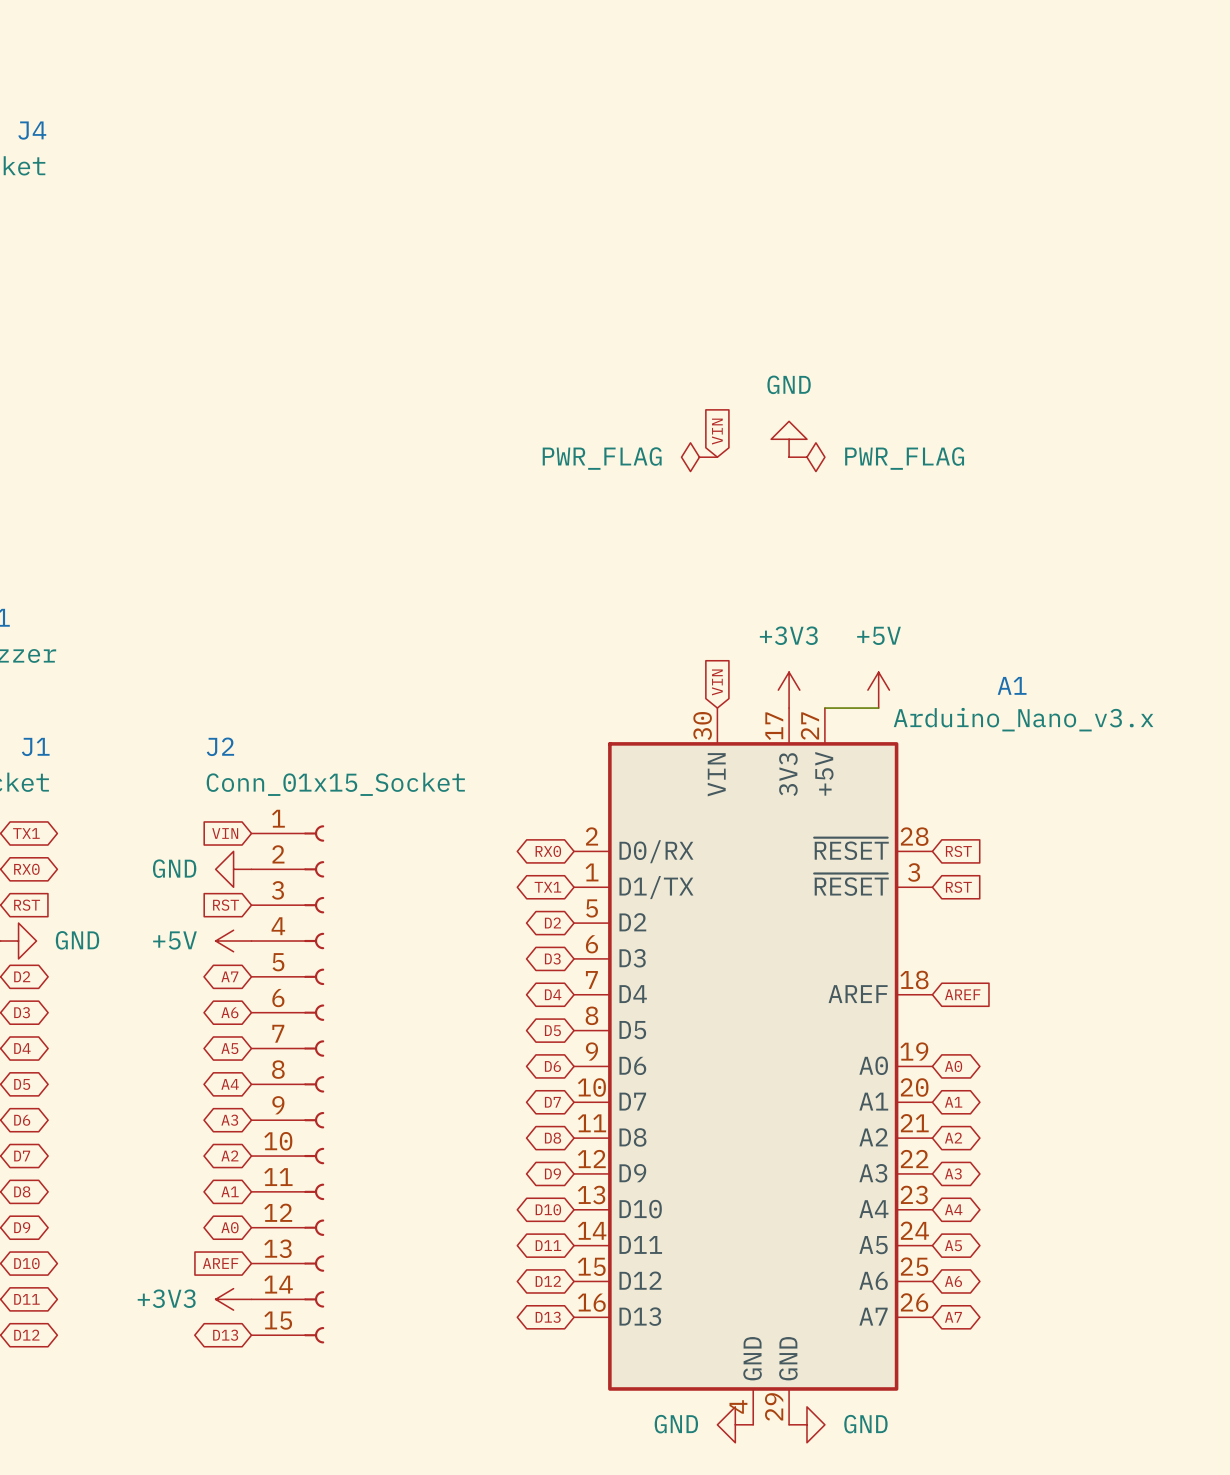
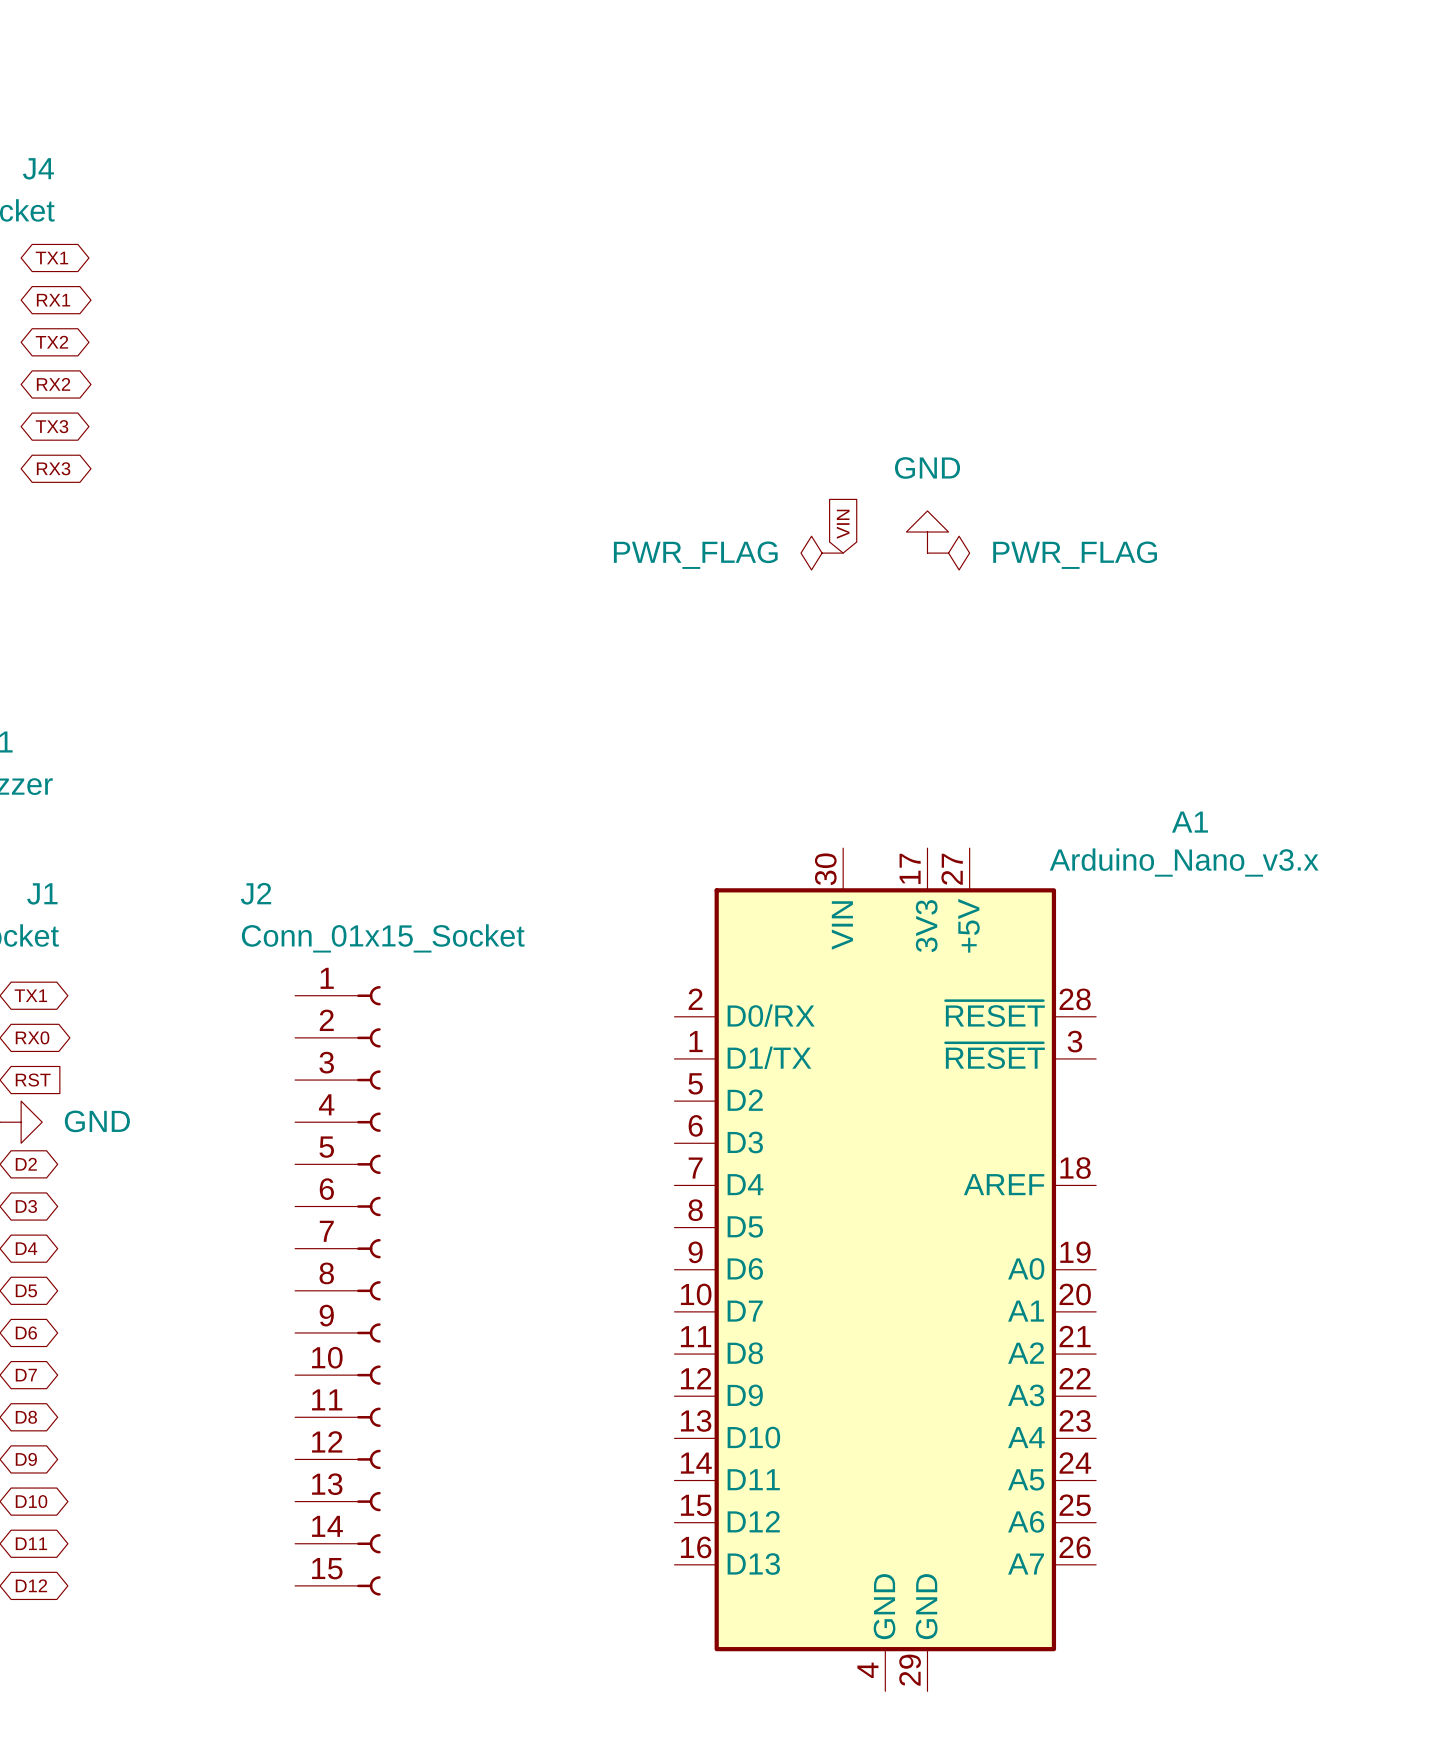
global label: none -> TX1 (51, 258)
global label: none -> RX1 (53, 300)
global label: none -> TX2 (51, 342)
global label: none -> RX2 (53, 384)
global label: none -> TX3 (52, 426)
global label: none -> RX3 (53, 468)
global label: VIN (717, 682) -> none
power symbol: +3V3 (789, 690) -> none
power symbol: +5V (878, 690) -> none
wire: (824, 708) (878, 708) -> none
global label: VIN (225, 833) -> none
global label: RX0 (548, 851) -> none
global label: RST (958, 851) -> none
power symbol: GND (233, 869) -> none
global label: TX1 (547, 887) -> none
global label: RST (958, 887) -> none
global label: RST (226, 905) -> none
global label: D2 (552, 922) -> none
power symbol: +5V (233, 941) -> none
global label: D3 (552, 958) -> none
global label: A7 (229, 976) -> none
global label: D4 (553, 994) -> none
global label: AREF (962, 994) -> none
global label: A6 (229, 1012) -> none
global label: D5 (552, 1030) -> none
global label: A5 (229, 1048) -> none
global label: D6 (552, 1066) -> none
global label: A0 (953, 1066) -> none
global label: A4 (230, 1084) -> none
global label: D7 (552, 1102) -> none
global label: A1 (953, 1102) -> none
global label: A3 (229, 1120) -> none
global label: D8 (553, 1138) -> none
global label: A2 (953, 1138) -> none
global label: A2 (229, 1155) -> none
global label: D9 (552, 1173) -> none
global label: A3 (953, 1173) -> none
global label: A1 (230, 1191) -> none
global label: D10 (548, 1209) -> none
global label: A4 (953, 1209) -> none
global label: A0 (229, 1227) -> none
global label: D11 (548, 1245) -> none
global label: A5 (953, 1245) -> none
global label: AREF (220, 1263) -> none
global label: D12 (548, 1281) -> none
global label: A6 (953, 1281) -> none
power symbol: +3V3 (233, 1299) -> none
global label: D13 (548, 1317) -> none
global label: A7 (953, 1317) -> none
global label: D13 (225, 1335) -> none
power symbol: GND (735, 1424) -> none
power symbol: GND (806, 1424) -> none

